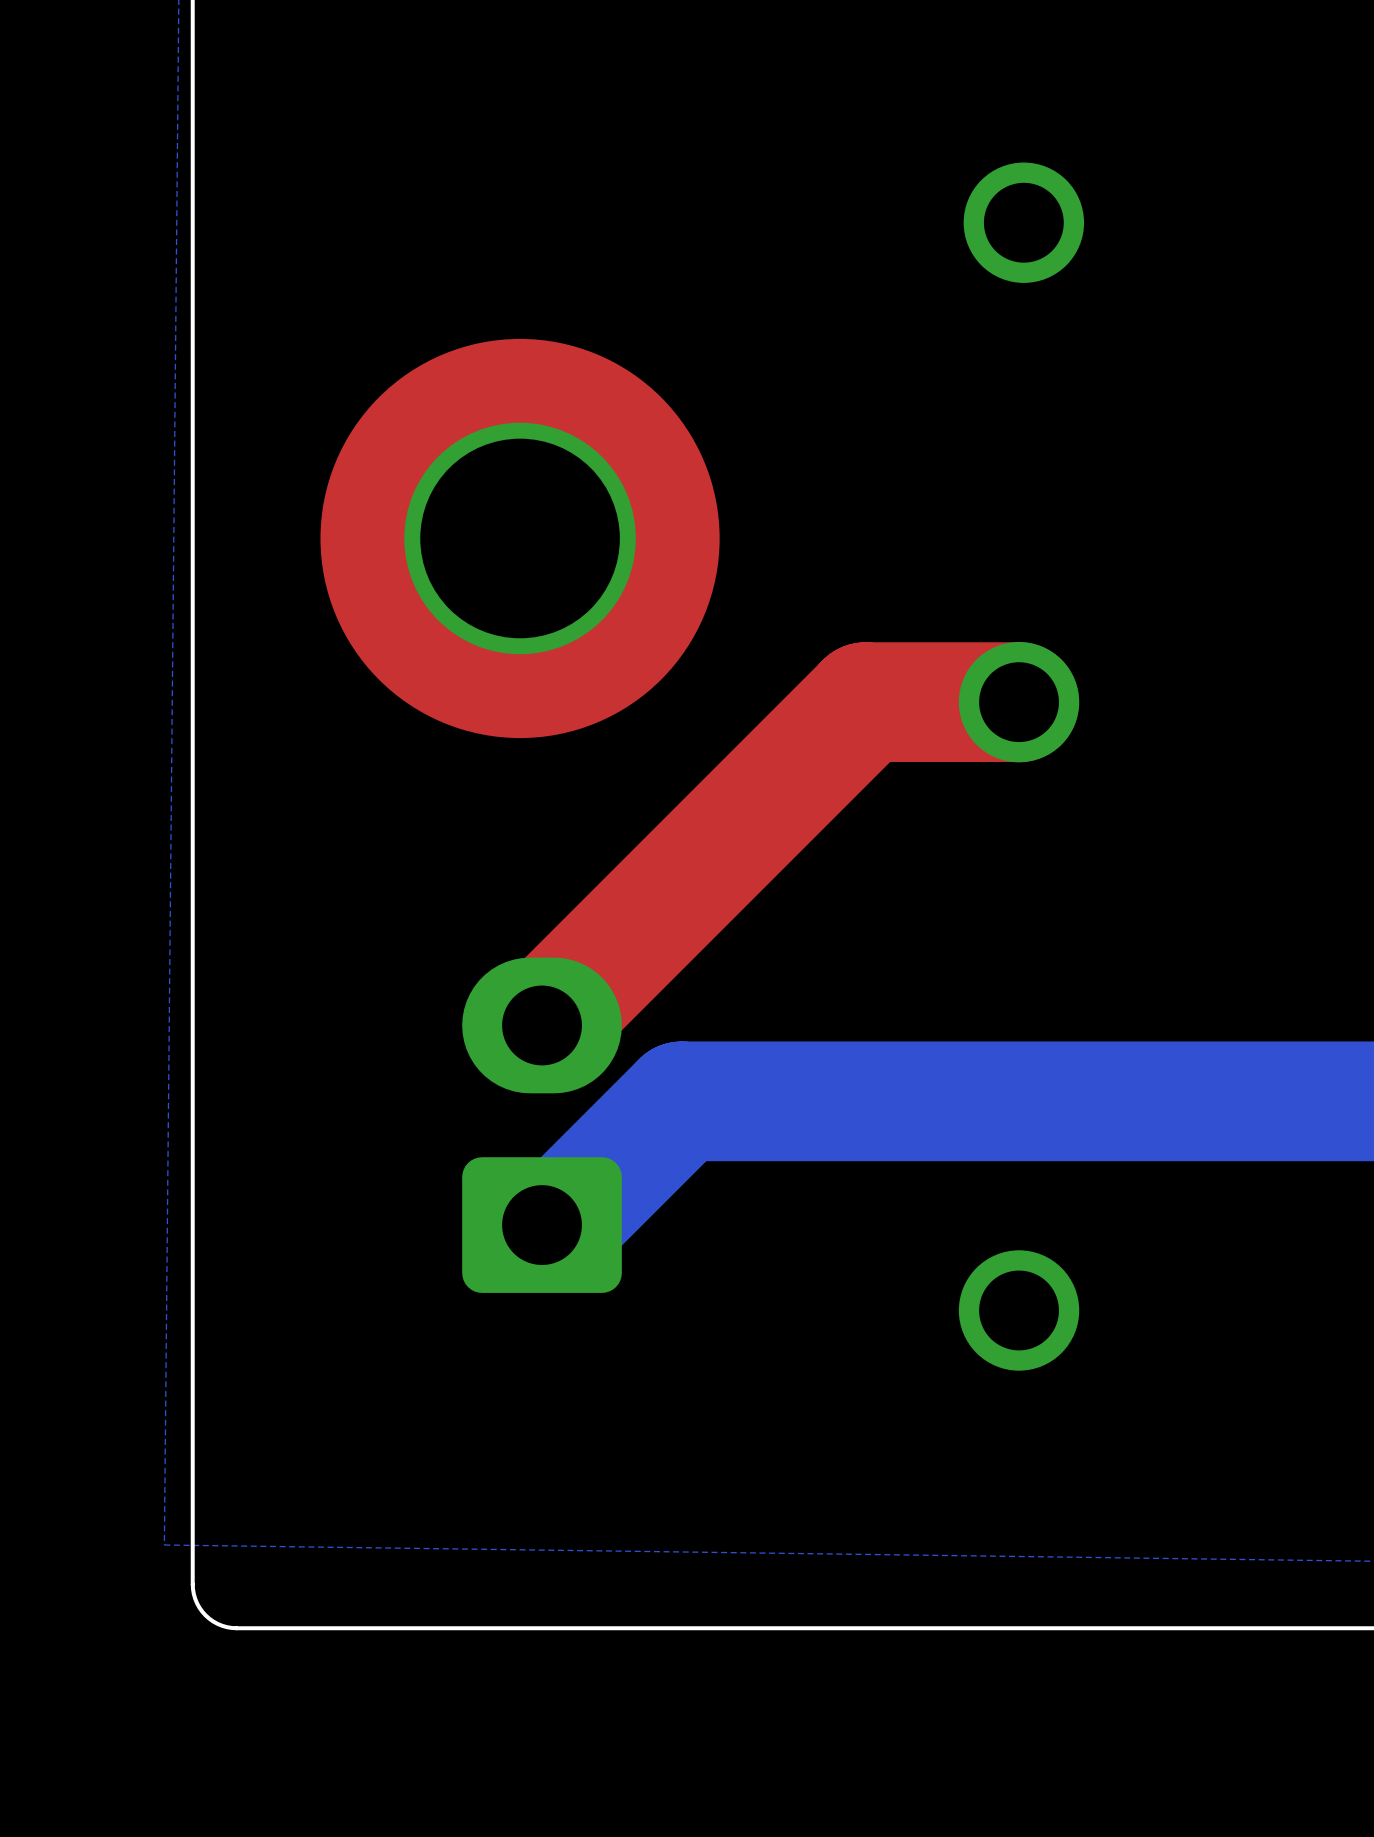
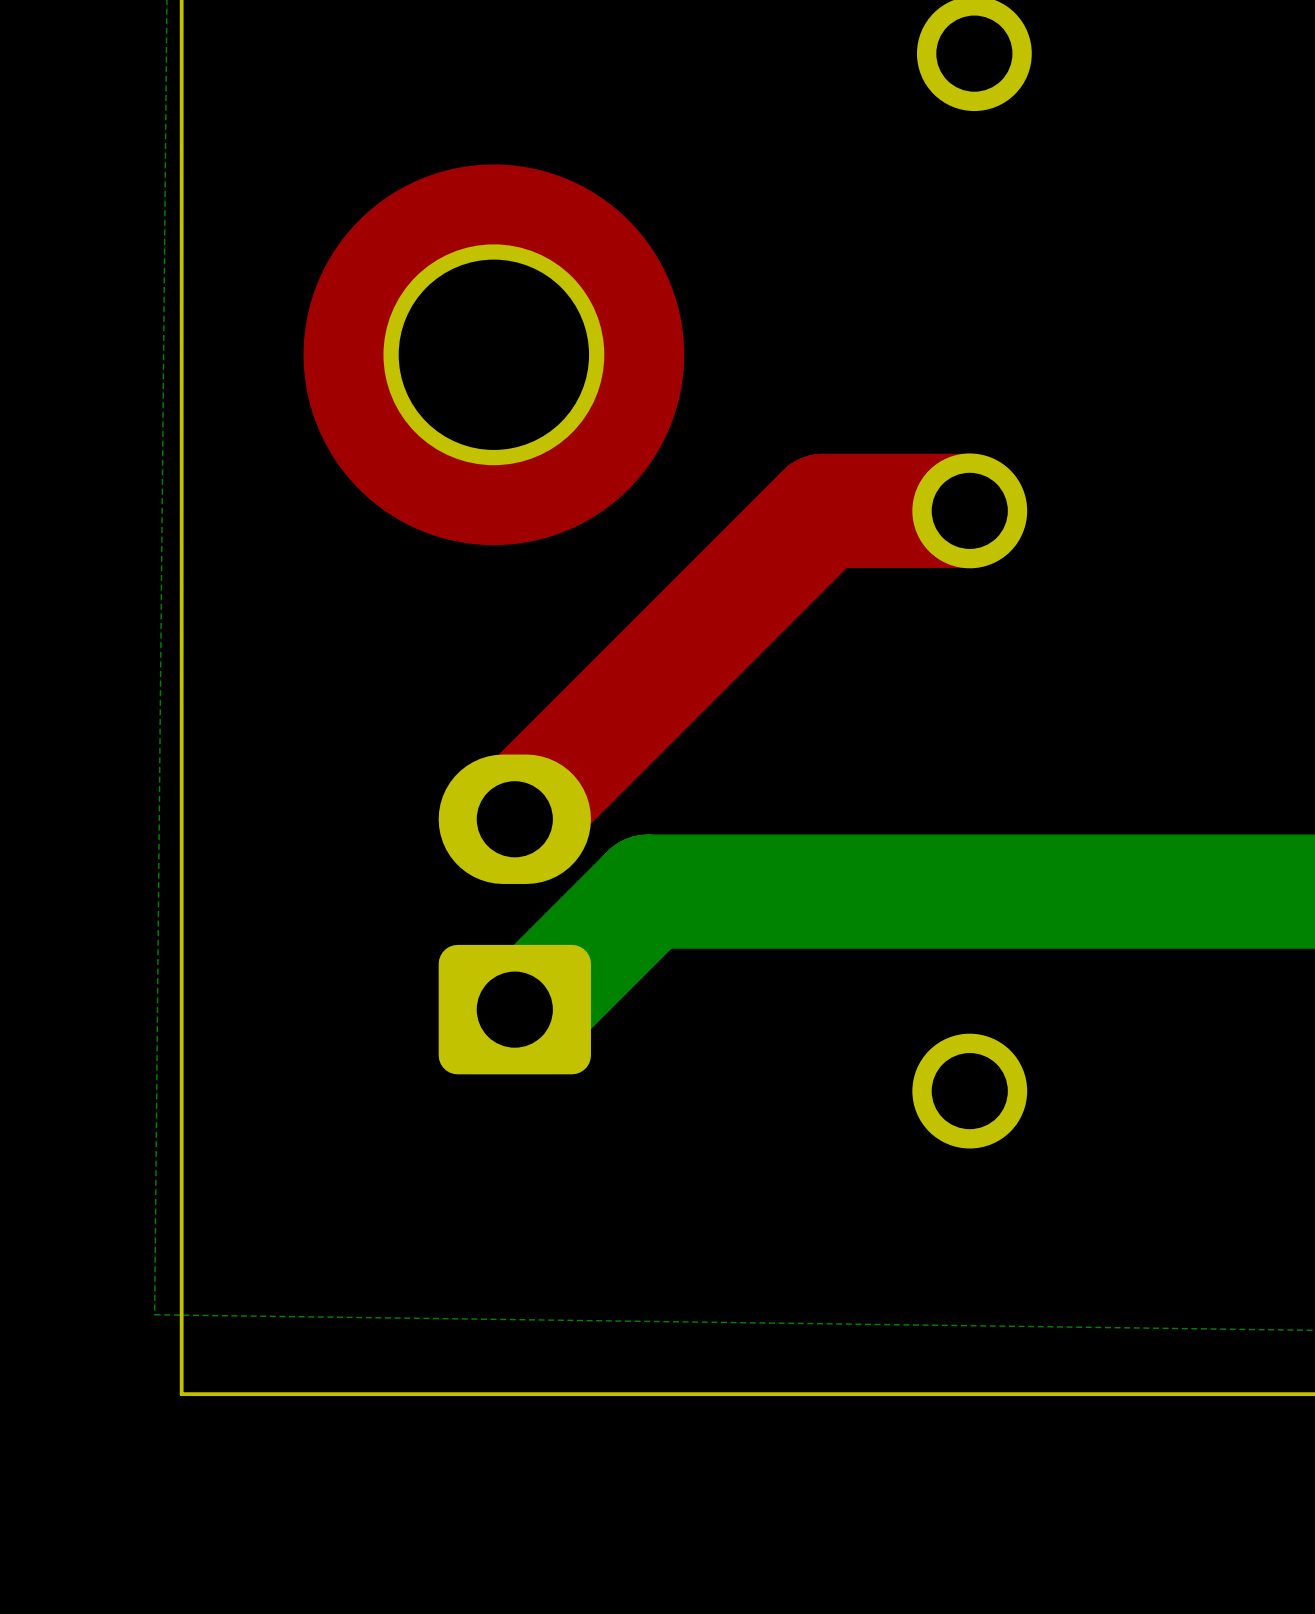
board edge: (192, 1584) (197, 1603) (205, 1615) (222, 1625) (236, 1628) -> (181, 1352) (181, 1394) (223, 1394)

